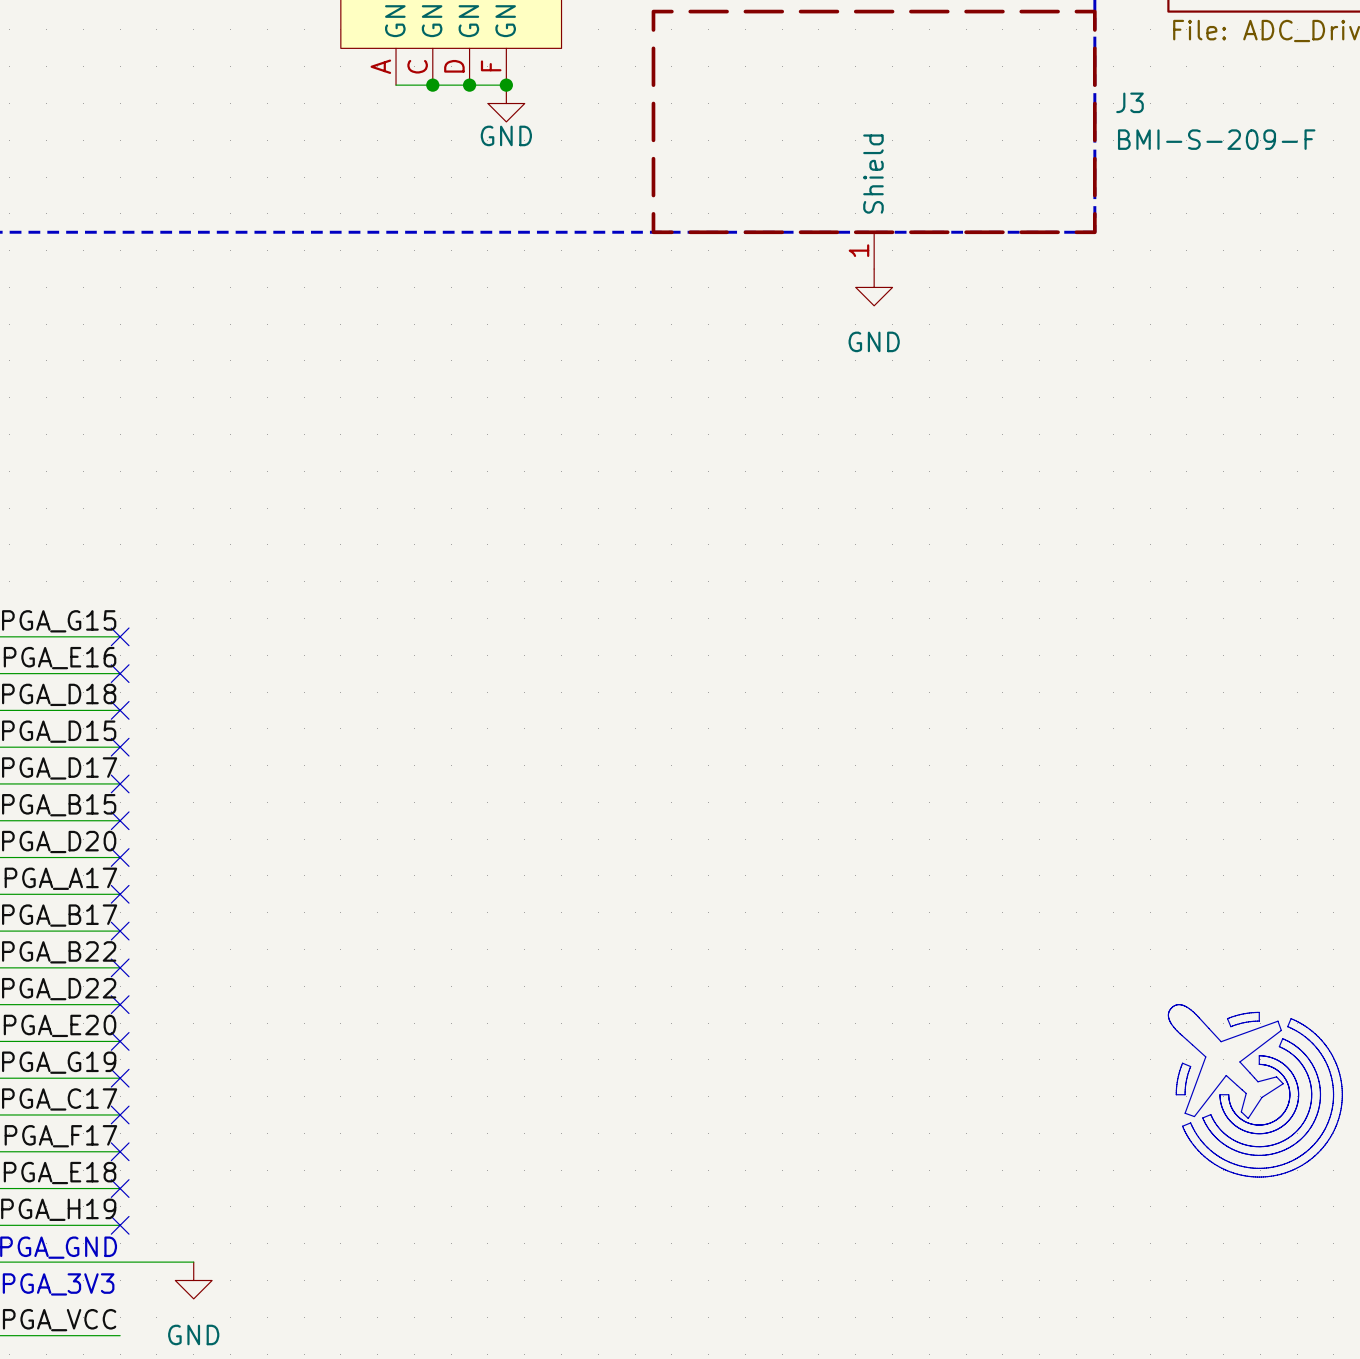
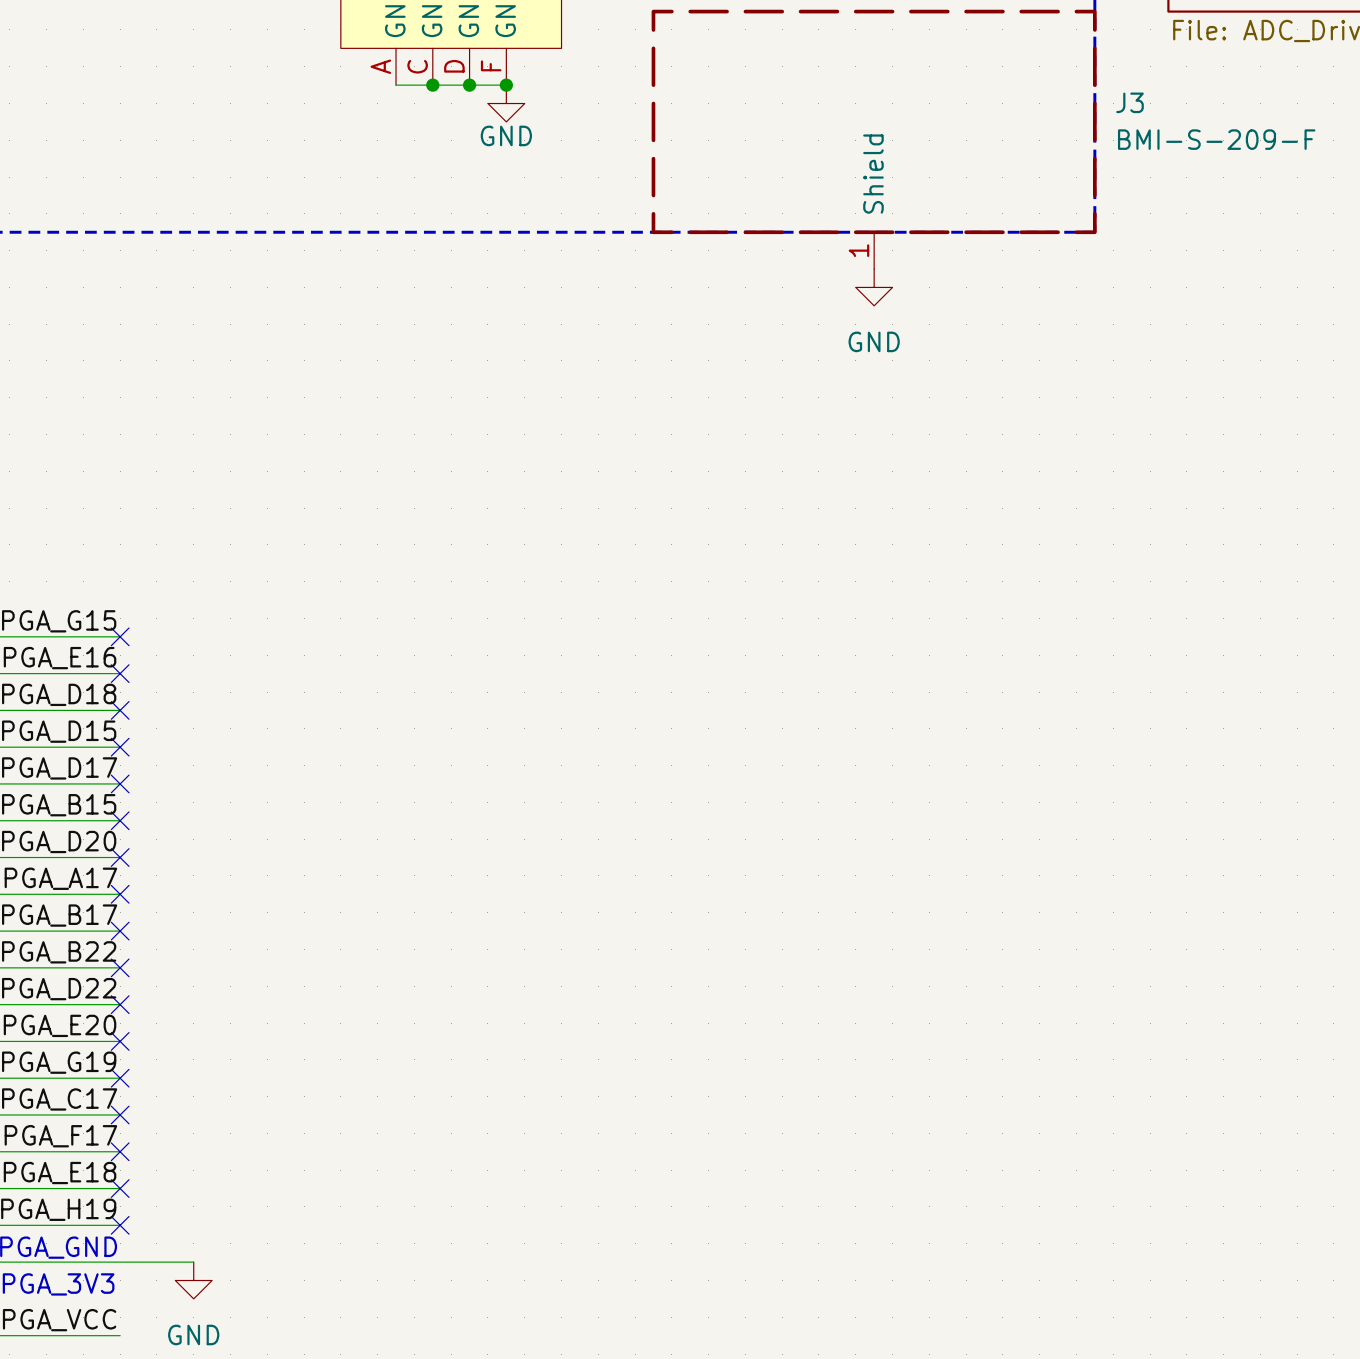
line: (1178, 1004) (1173, 1006) (1169, 1011) (1170, 1021) (1178, 1032) (1205, 1056) (1185, 1113) (1194, 1116) (1226, 1075) (1246, 1093) (1241, 1111) (1248, 1118) (1261, 1097) (1283, 1083) (1276, 1076) (1258, 1081) (1239, 1061) (1281, 1030) (1277, 1021) (1221, 1041) (1192, 1011) (1178, 1004) -> none
line: (1255, 1012) (1241, 1014) (1227, 1018) (1230, 1026) (1259, 1021) (1259, 1012) (1255, 1012) -> none
line: (1291, 1018) (1287, 1026) (1301, 1034) (1313, 1043) (1323, 1057) (1329, 1071) (1333, 1098) (1327, 1124) (1315, 1142) (1300, 1156) (1280, 1165) (1259, 1168) (1241, 1166) (1222, 1158) (1204, 1144) (1190, 1122) (1182, 1126) (1190, 1140) (1200, 1152) (1225, 1170) (1241, 1175) (1257, 1177) (1273, 1175) (1289, 1171) (1303, 1164) (1316, 1154) (1327, 1141) (1335, 1128) (1340, 1112) (1342, 1094) (1340, 1078) (1336, 1063) (1328, 1049) (1318, 1036) (1305, 1026) (1291, 1018) -> none
line: (1282, 1038) (1279, 1046) (1297, 1058) (1309, 1078) (1311, 1097) (1307, 1115) (1299, 1128) (1288, 1138) (1275, 1144) (1260, 1146) (1245, 1144) (1230, 1138) (1218, 1127) (1210, 1114) (1202, 1117) (1216, 1137) (1234, 1150) (1257, 1155) (1281, 1151) (1301, 1138) (1315, 1119) (1320, 1096) (1316, 1072) (1303, 1052) (1282, 1038) -> none
line: (1259, 1055) (1259, 1064) (1276, 1069) (1288, 1084) (1289, 1101) (1280, 1116) (1265, 1124) (1249, 1123) (1234, 1112) (1228, 1094) (1219, 1094) (1222, 1109) (1231, 1122) (1244, 1130) (1259, 1133) (1274, 1130) (1287, 1122) (1295, 1109) (1298, 1094) (1295, 1079) (1287, 1067) (1274, 1058) (1259, 1055) -> none
line: (1182, 1063) (1177, 1078) (1176, 1094) (1185, 1094) (1190, 1066) (1182, 1063) -> none

